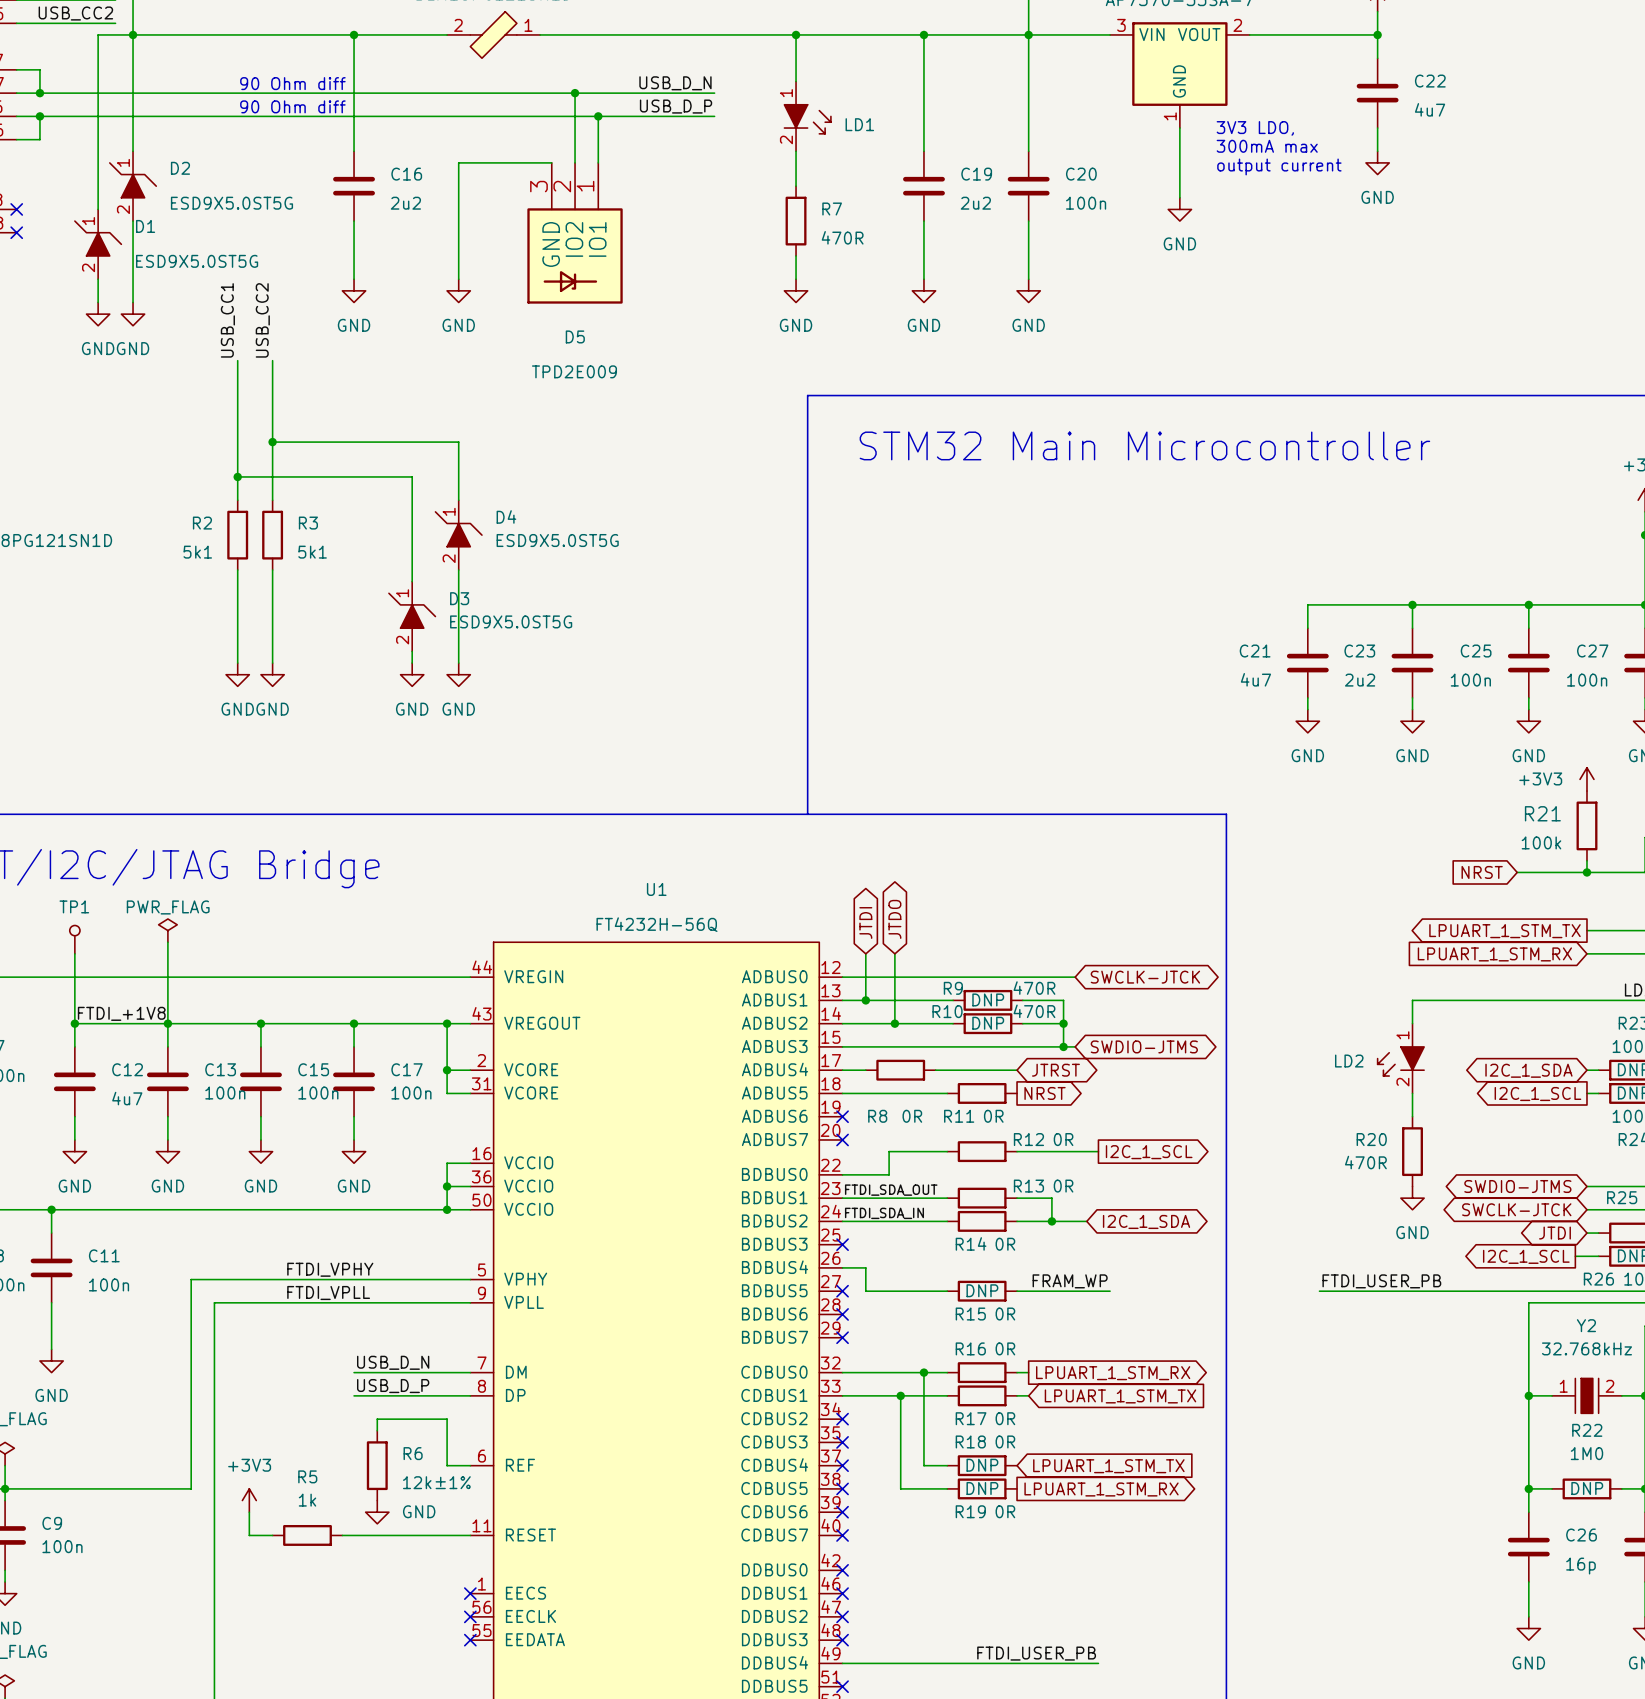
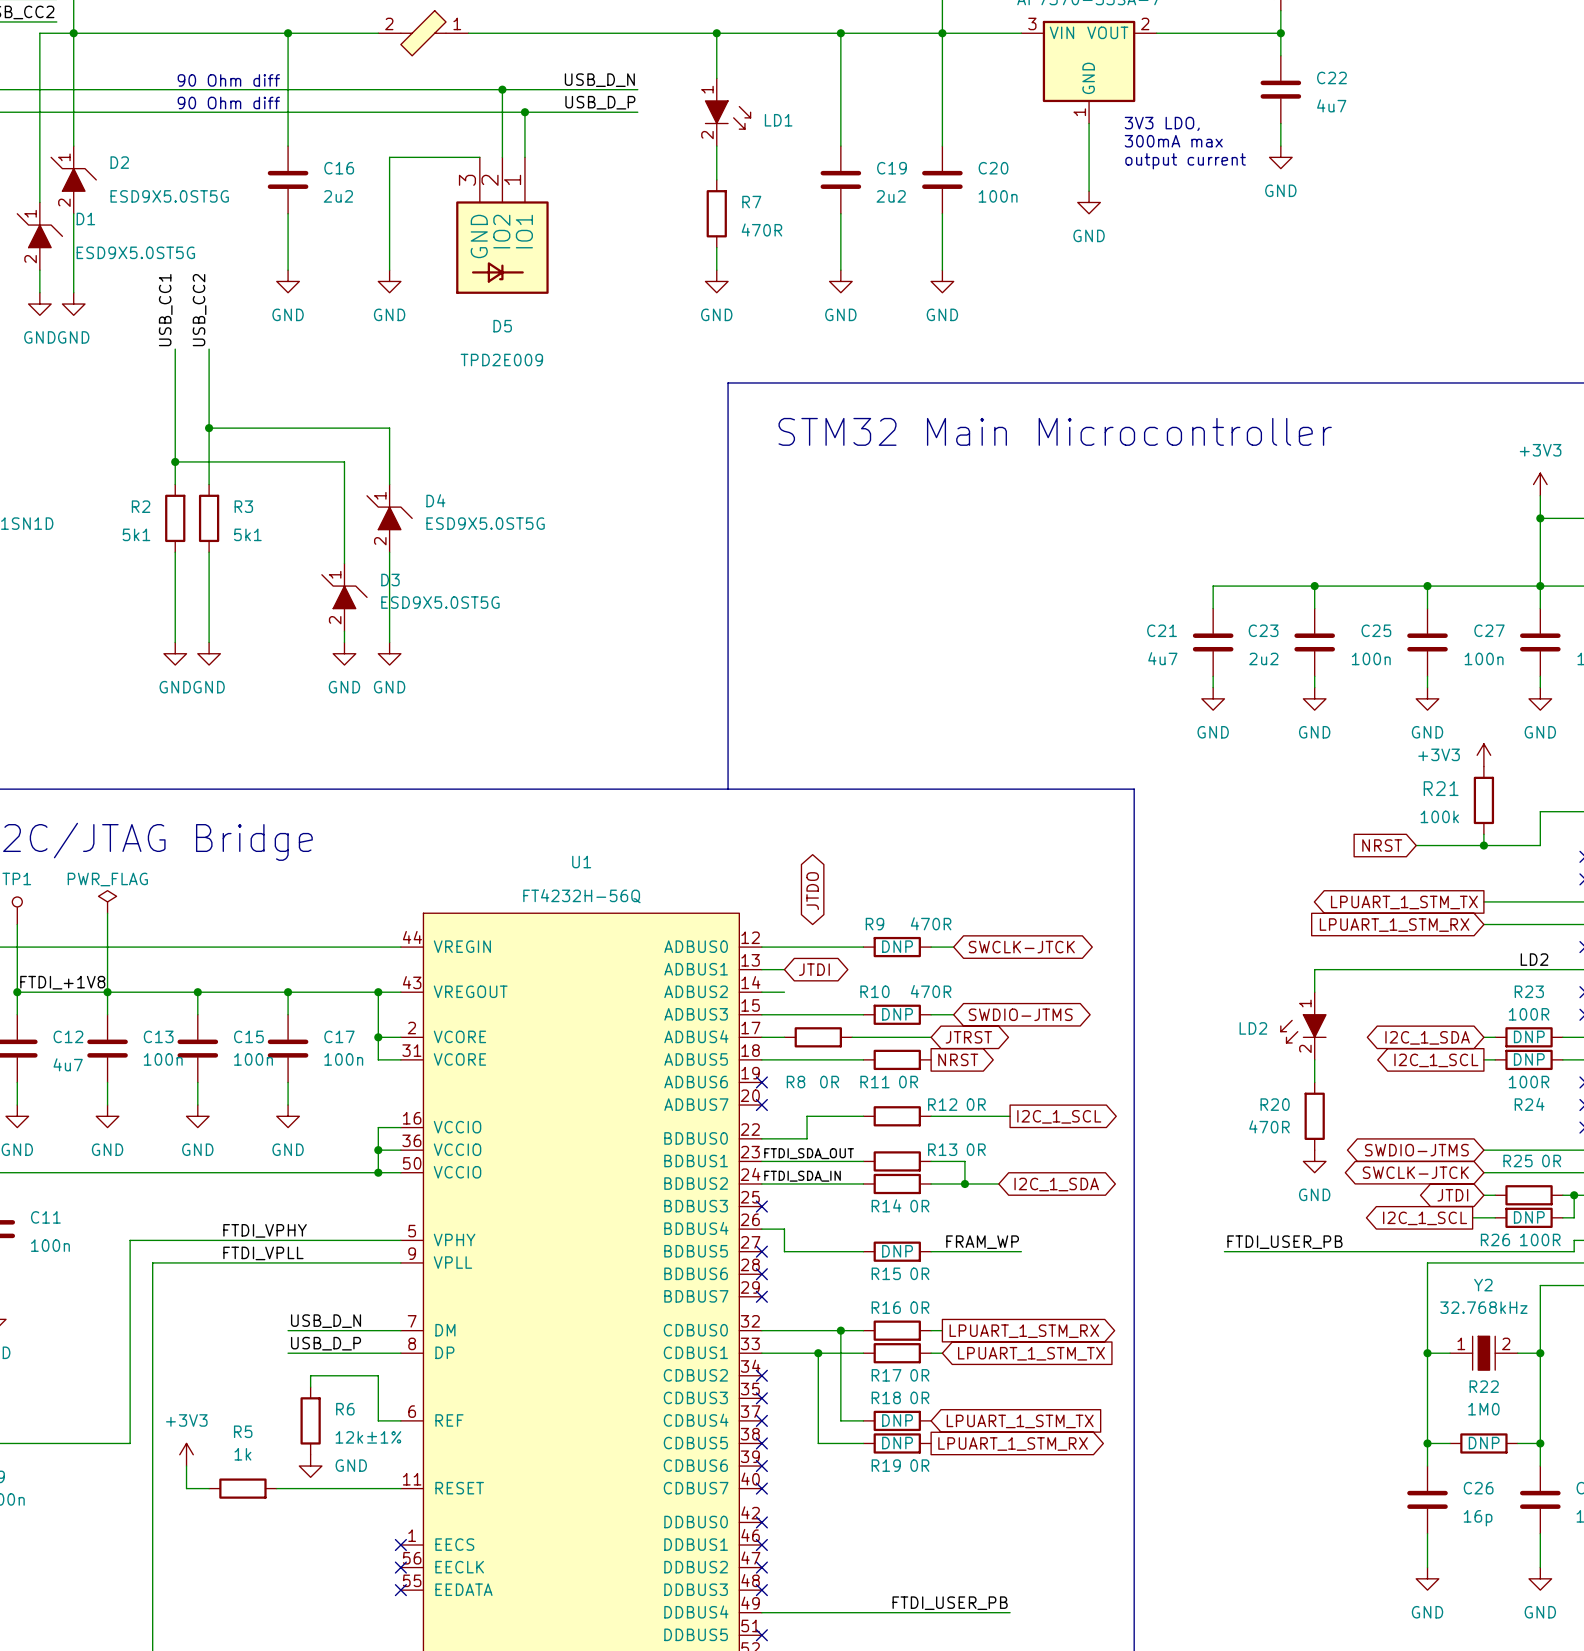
global label rotation: 0° (865, 922) -> 90° clockwise (814, 969)
global label position: JTDI (865, 922) -> JTDI (814, 969)
wire: (865, 953) (865, 1000) (953, 1000) -> none
wire: (894, 953) (894, 1023) -> none
wire: (1040, 977) (1075, 977) -> none
global label position: SWCLK-JTCK (1145, 977) -> SWCLK-JTCK (1021, 947)
R9 name position: R9 (953, 988) -> R9 (874, 924)
R9 text position: 470R (1034, 988) -> 470R (931, 923)
junction: (865, 1000) -> none
R9 position: (987, 1000) -> (897, 947)
wire: (1022, 1000) (1063, 1000) (1063, 1046) -> none
R10 name position: R10 (947, 1011) -> R10 (874, 991)
R10 text position: 470R (1034, 1011) -> 470R (931, 991)
wire: (865, 1023) (953, 1023) -> none
junction: (894, 1023) -> none
R10 position: (987, 1023) -> (897, 1014)
wire: (1022, 1023) (1063, 1023) -> none
junction: (1063, 1023) -> none
wire: (1040, 1046) (1075, 1046) -> none
junction: (1063, 1046) -> none
global label position: SWDIO-JTMS (1144, 1046) -> SWDIO-JTMS (1020, 1014)

